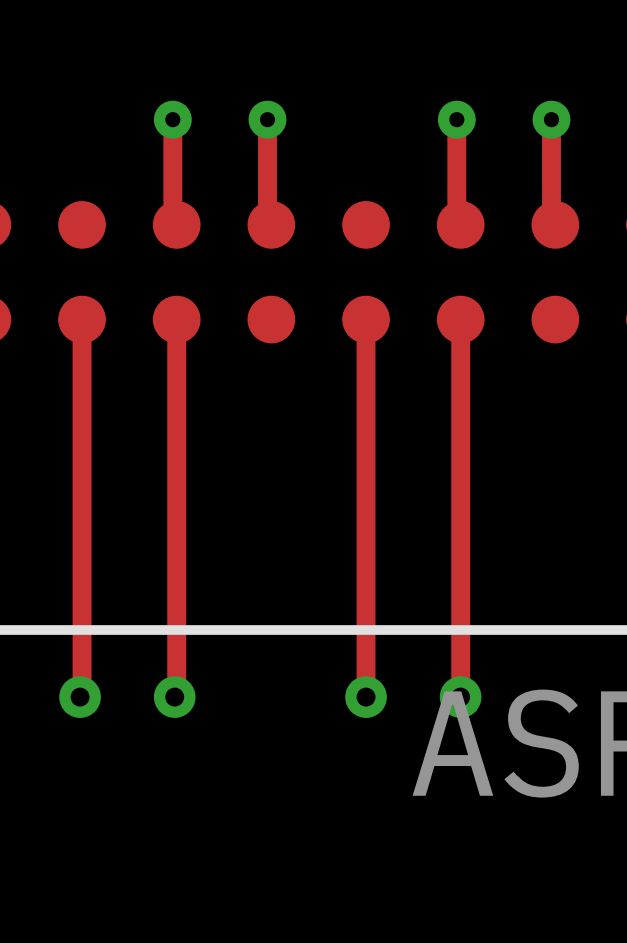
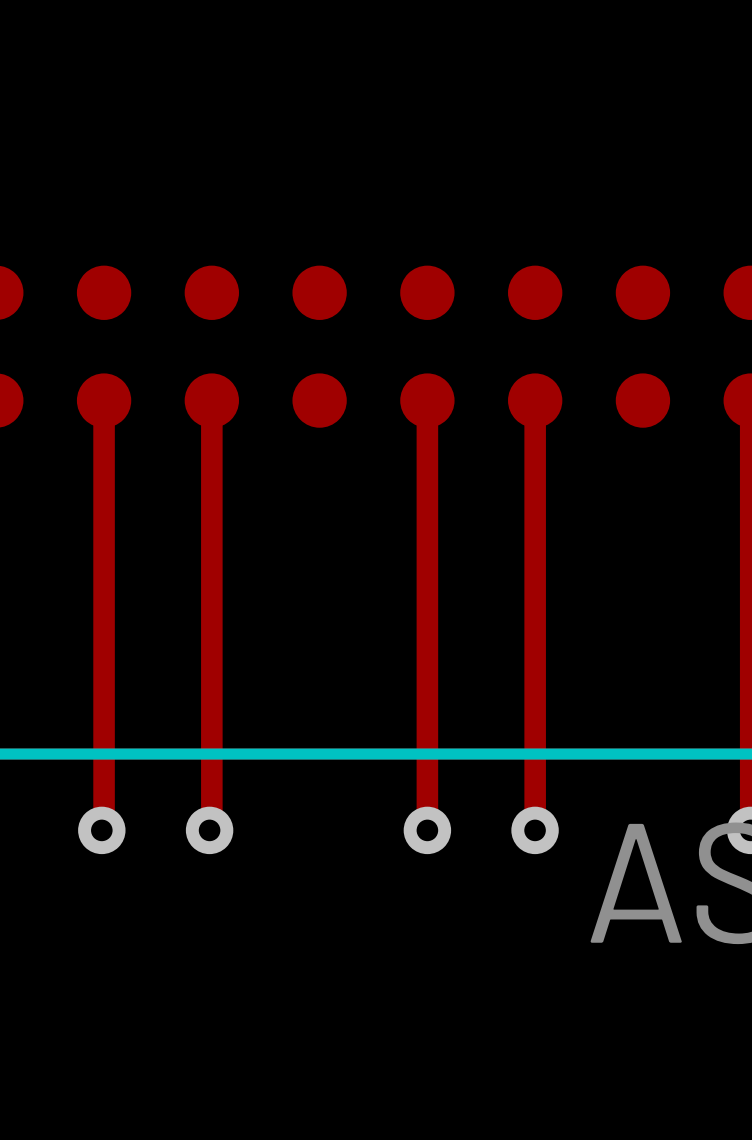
track: (172, 119) (172, 221) (176, 224) -> none
via: (172, 119) -> none
track: (267, 119) (267, 221) (271, 224) -> none
via: (267, 119) -> none
track: (456, 119) (456, 221) (460, 224) -> none
via: (456, 119) -> none
track: (551, 119) (551, 221) (555, 224) -> none
via: (551, 119) -> none

